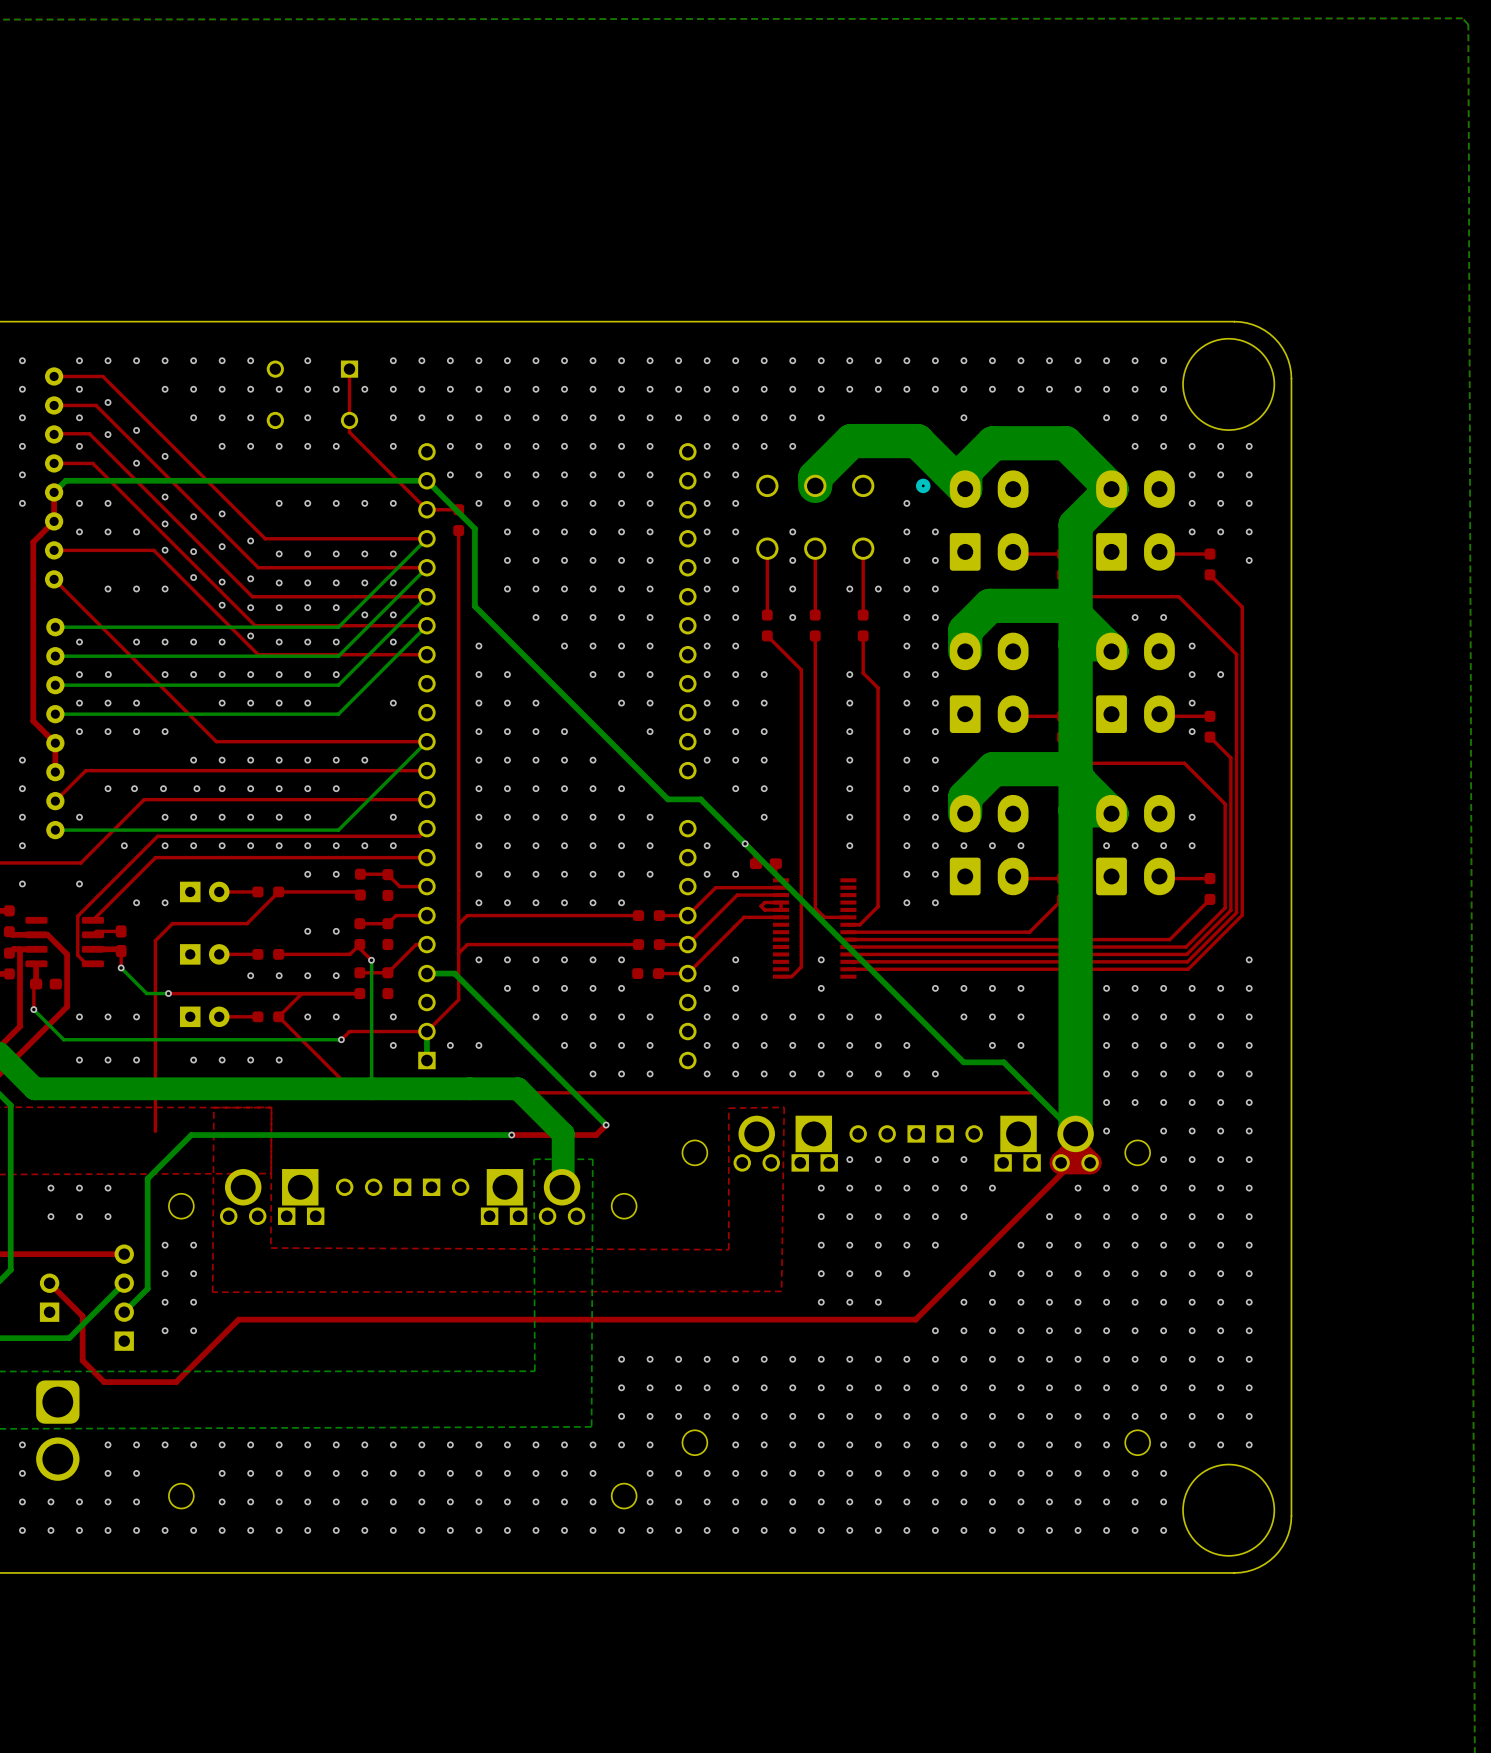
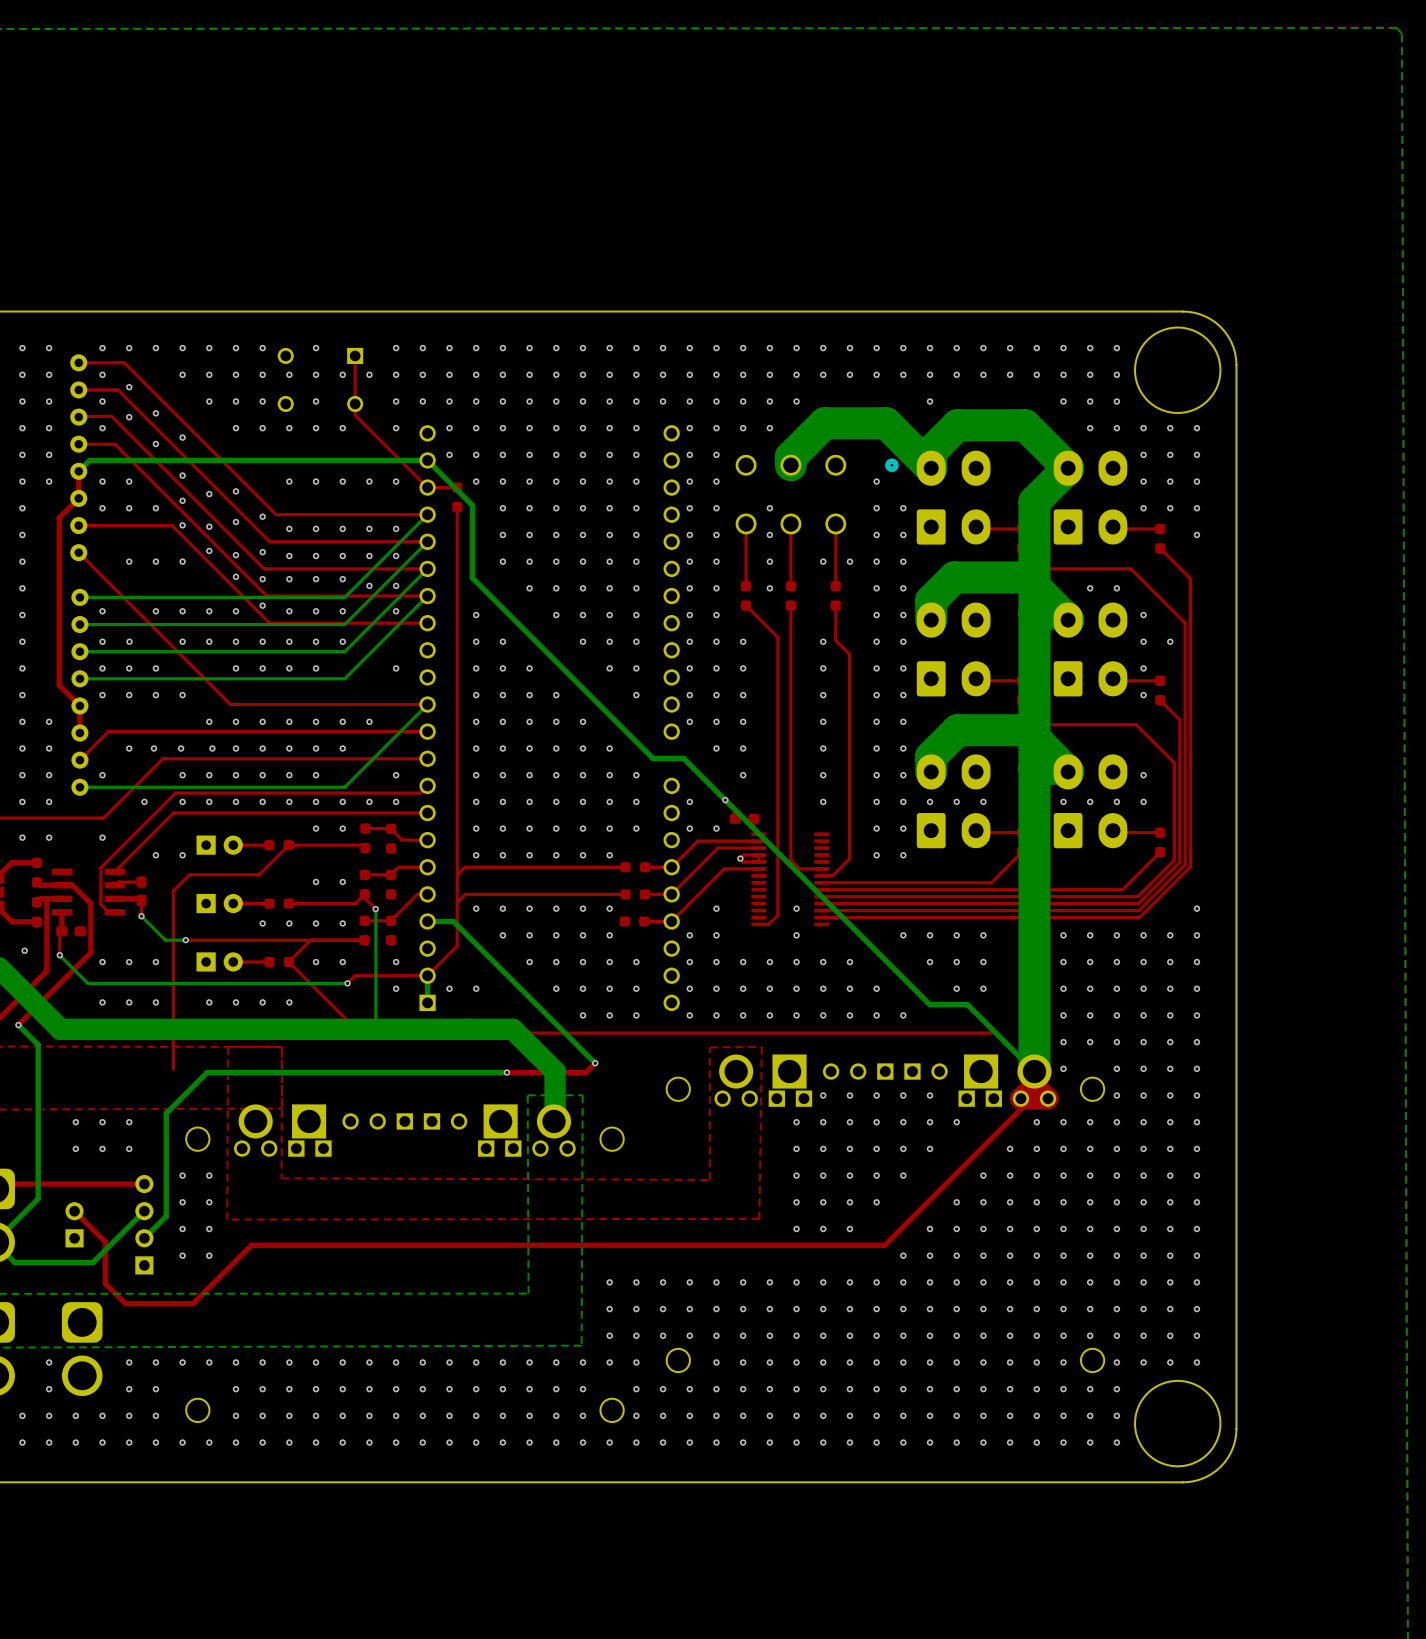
via: none -> (740, 858)

